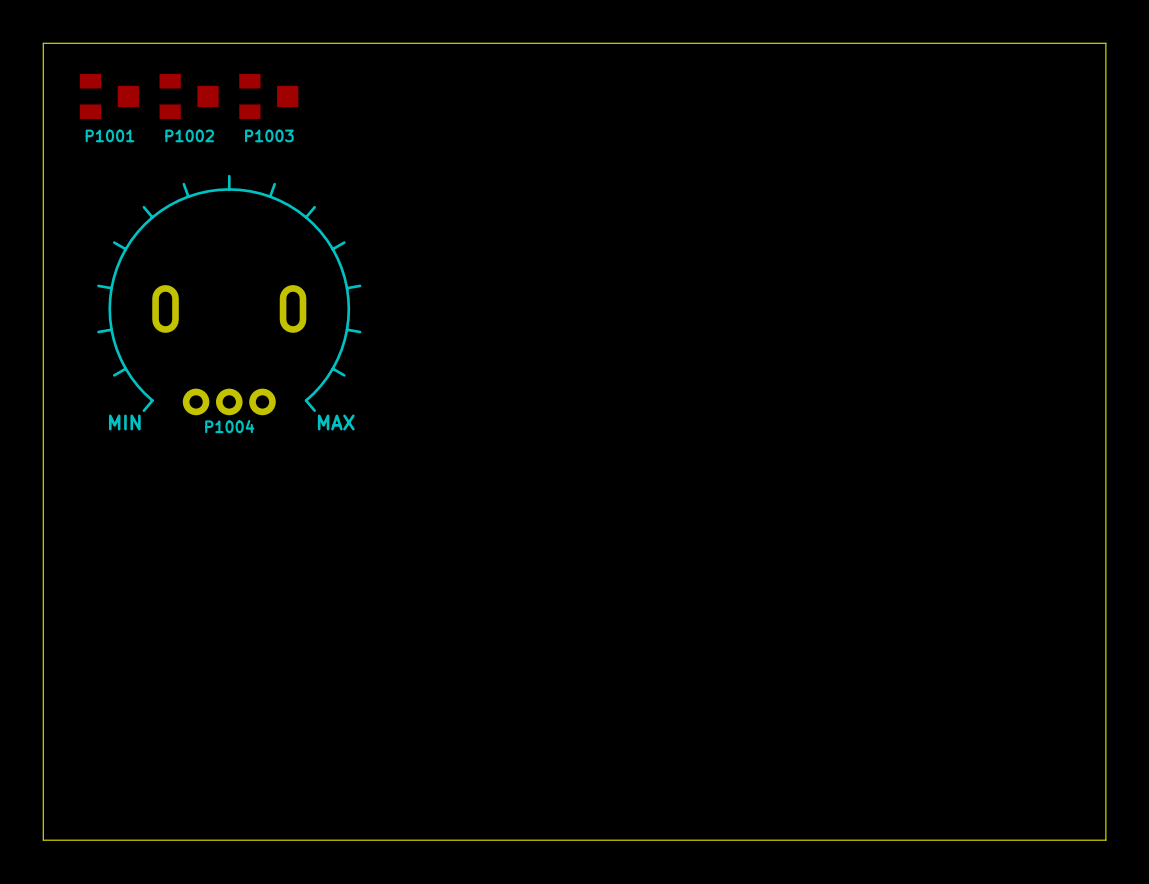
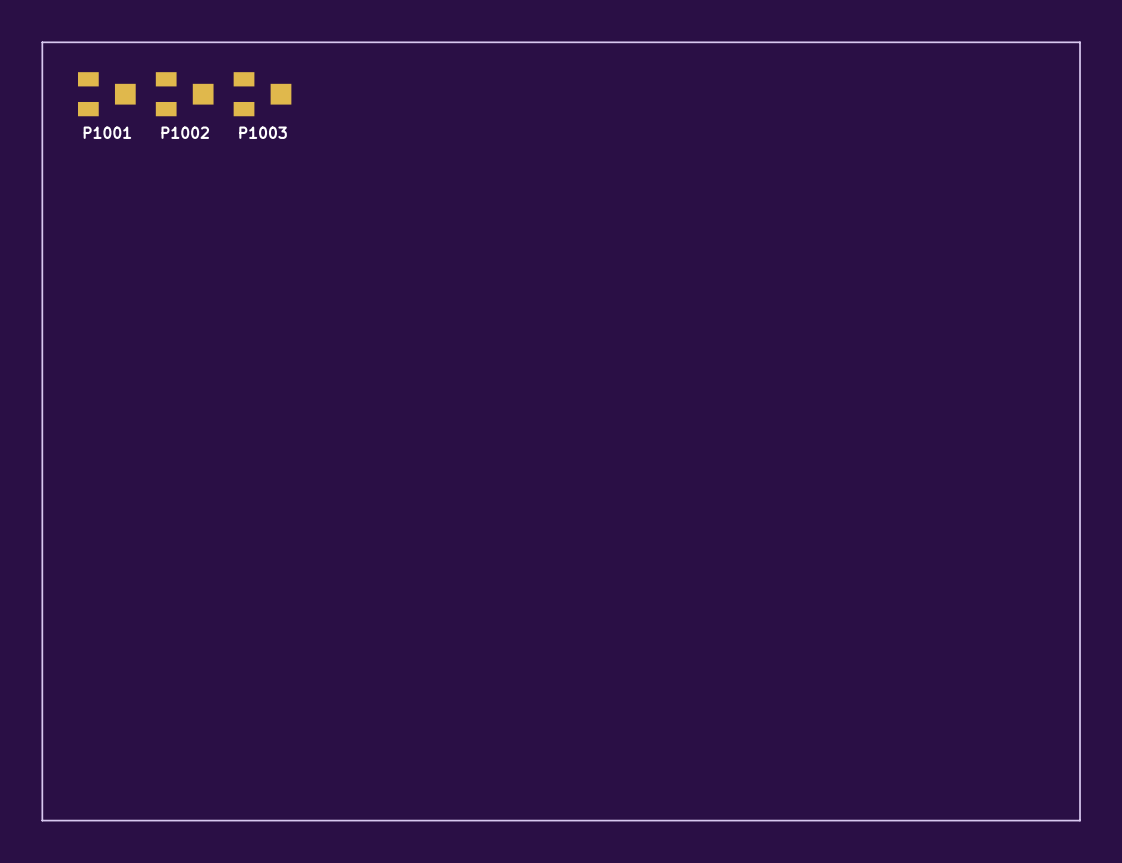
drawing: [97, 174, 362, 413] -> none
P1004: (229, 350) -> none

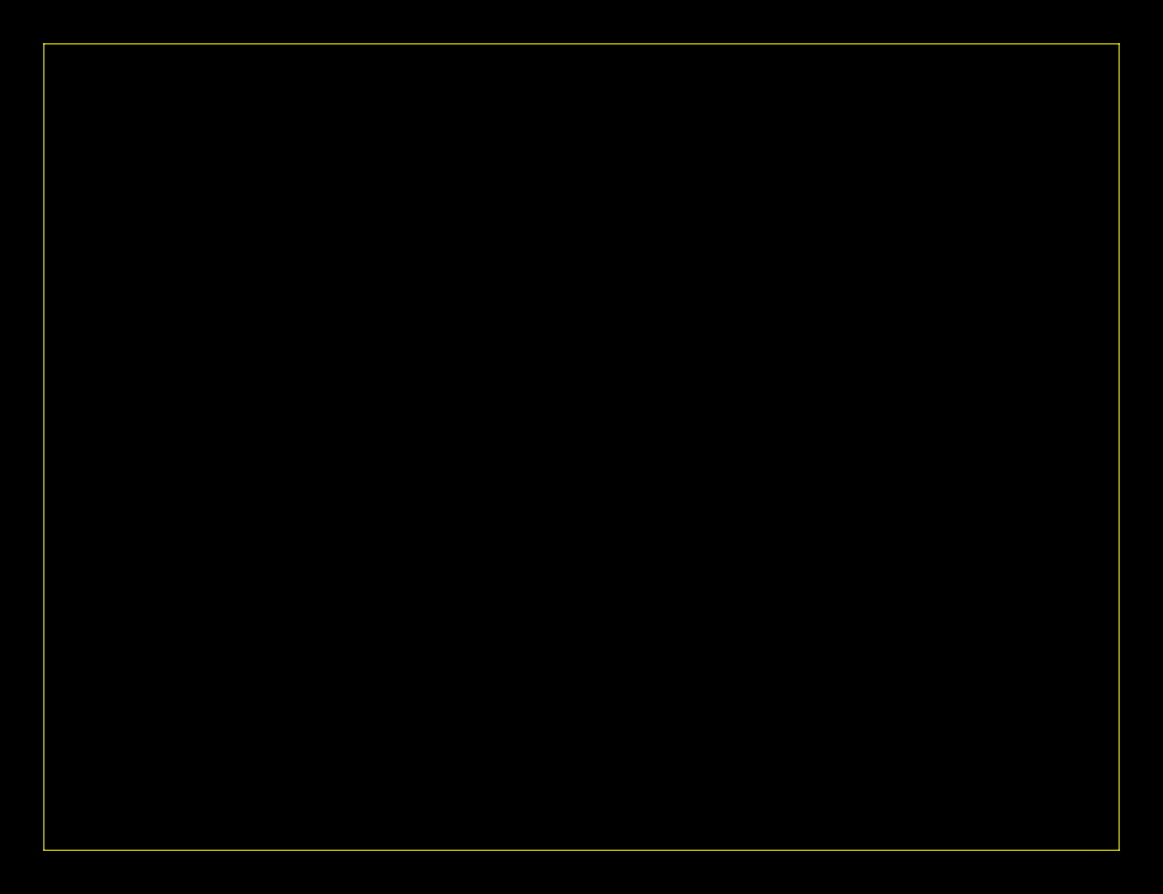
P1001: (106, 94) -> none
P1002: (184, 94) -> none
P1003: (262, 94) -> none

